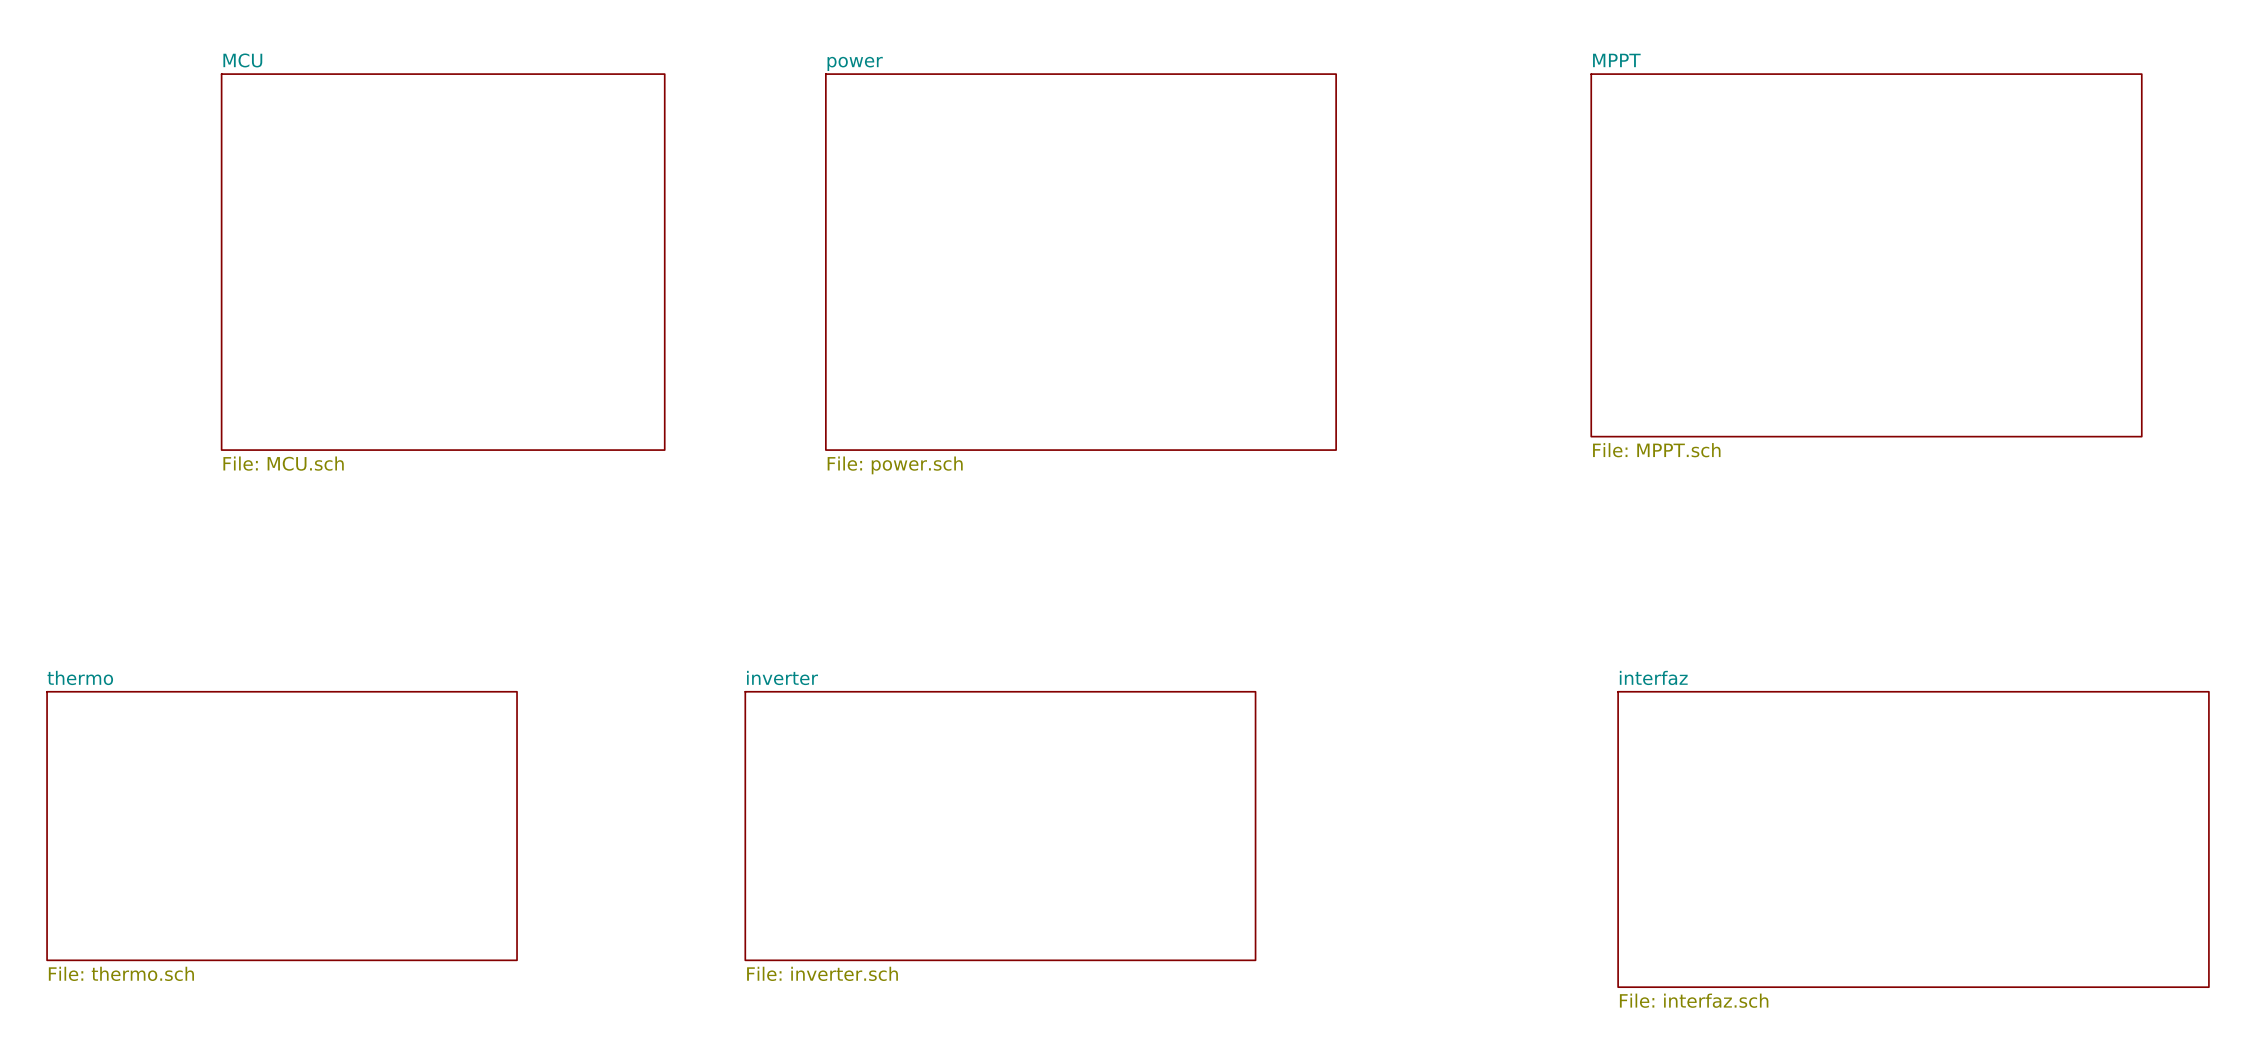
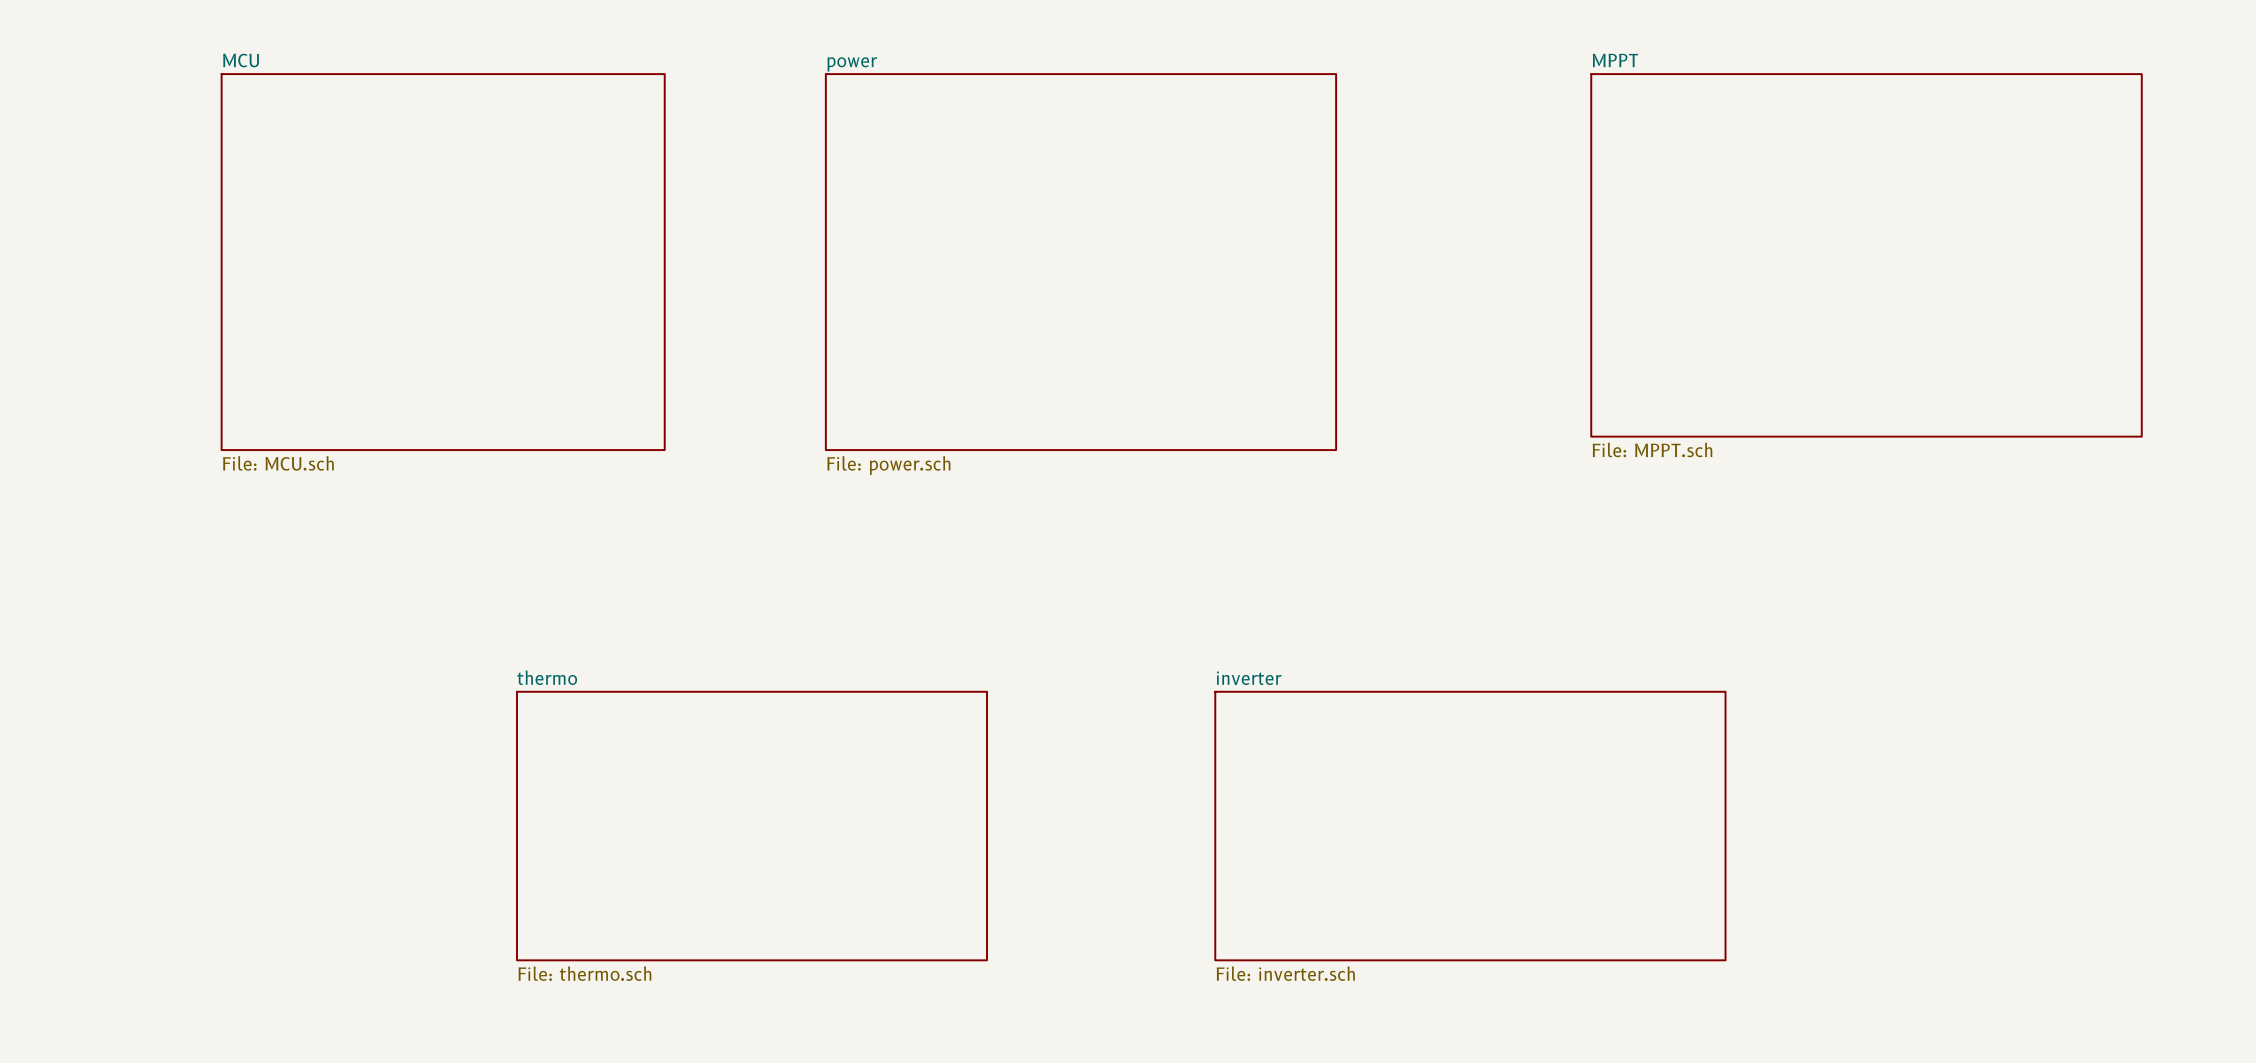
sheet thermo: File: thermo.sch (282, 826) -> none
sheet thermo: none -> File: thermo.sch (752, 826)
sheet inverter: File: inverter.sch (1000, 826) -> none
sheet inverter: none -> File: inverter.sch (1470, 826)
sheet interfaz: File: interfaz.sch (1913, 839) -> none

